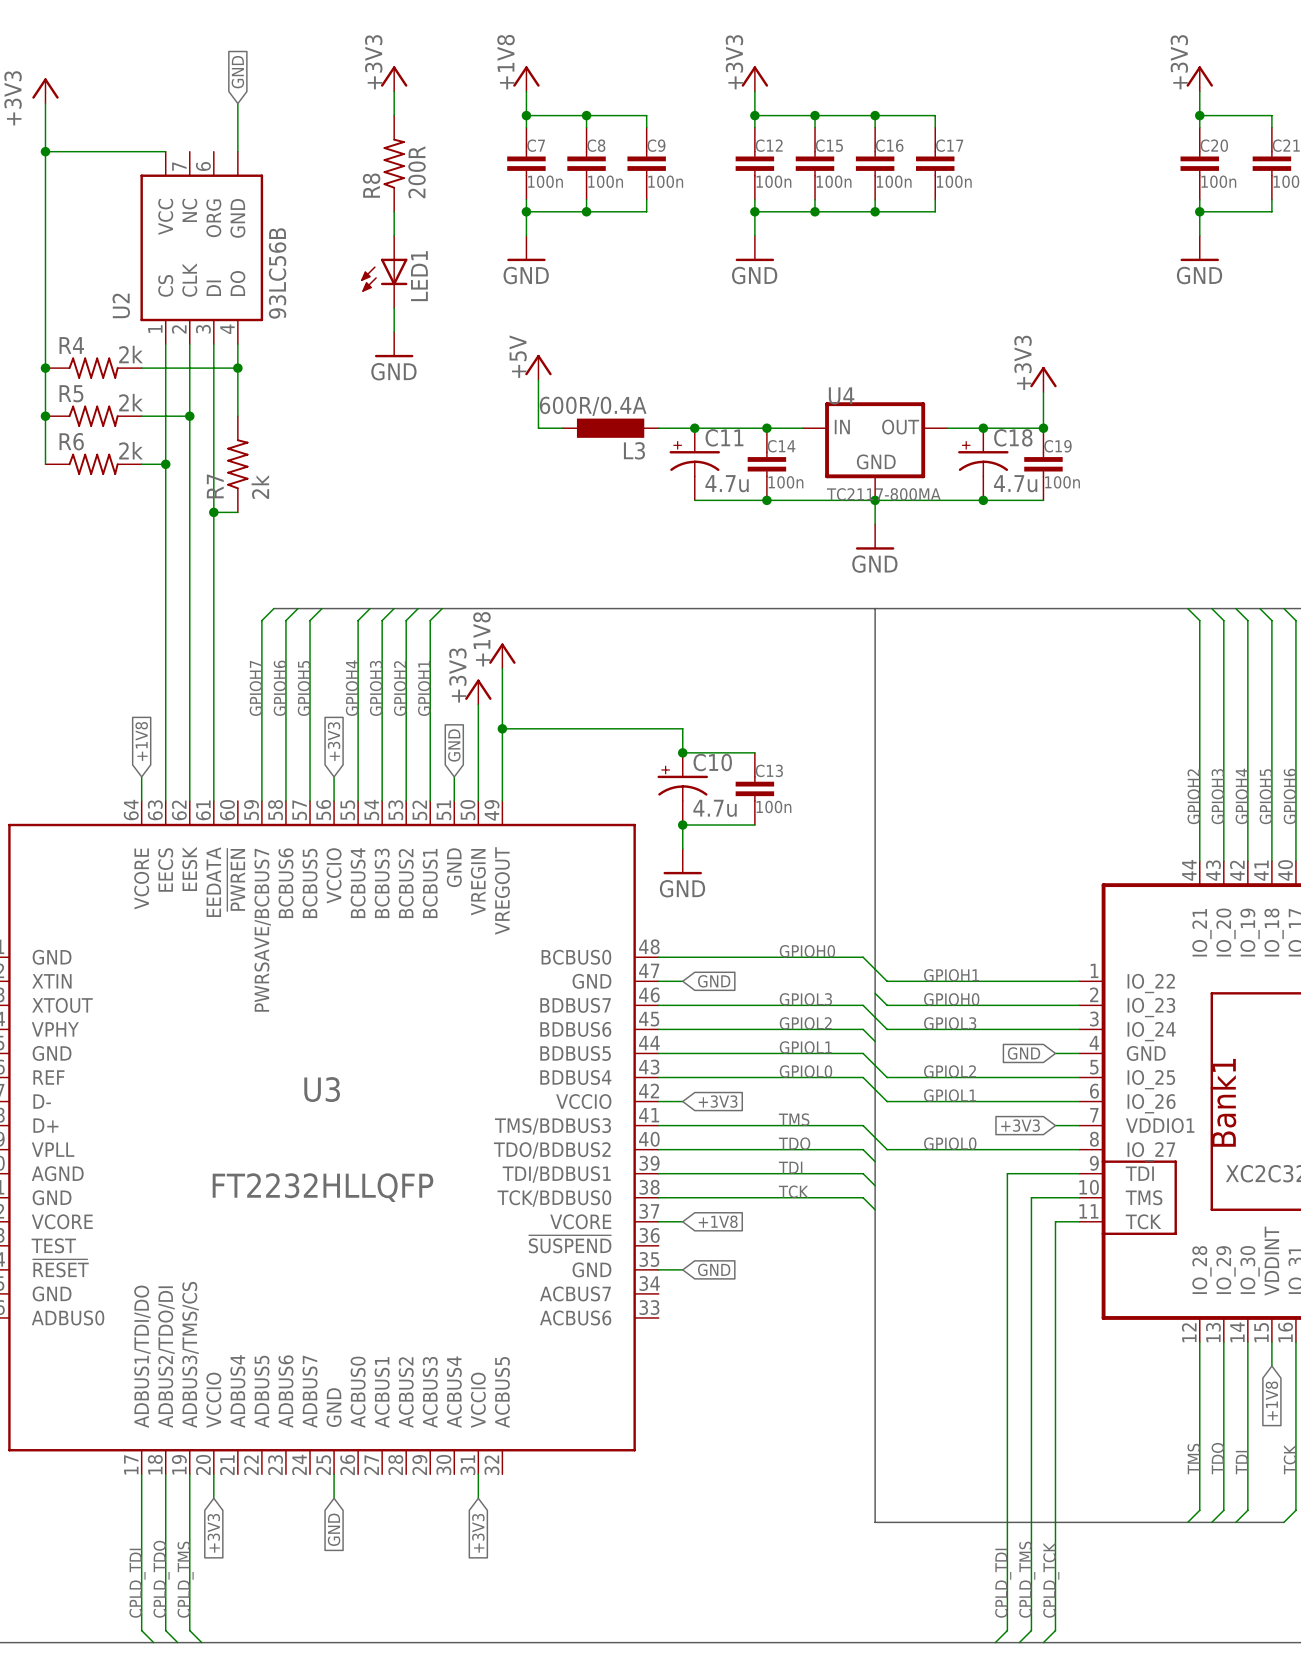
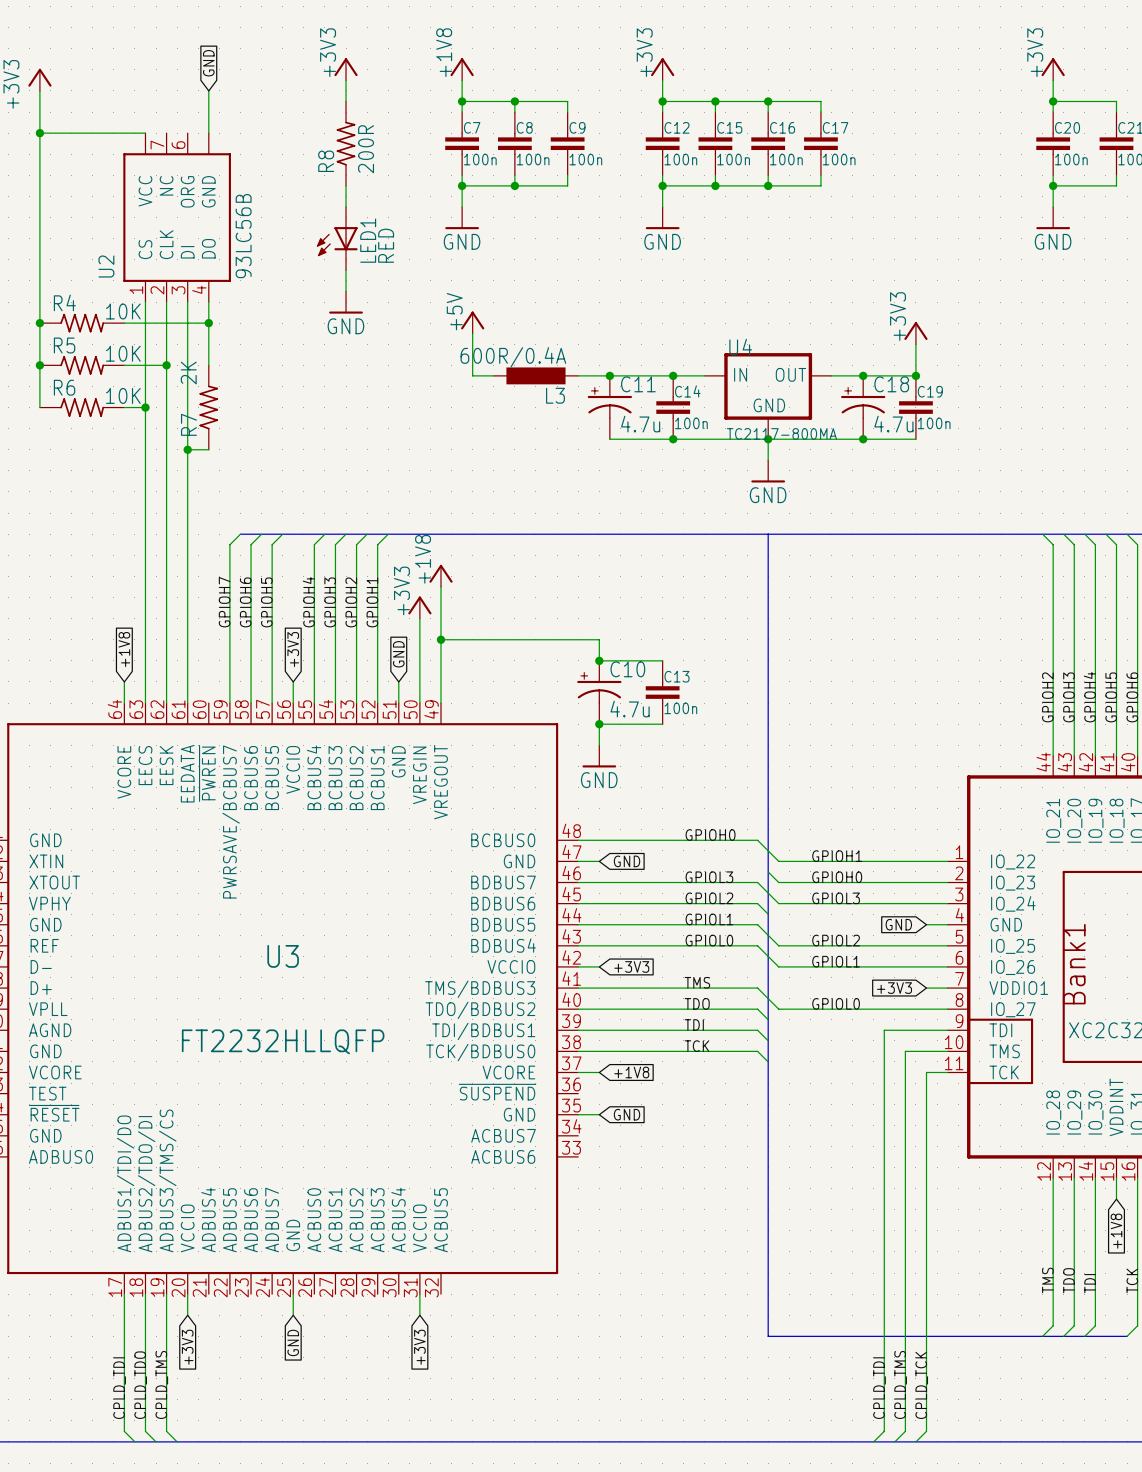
LED1 value: none -> RED (386, 245)
R4 value: 2k (130, 354) -> 10K (123, 311)
R5 value: 2k (130, 402) -> 10K (123, 353)
R6 value: 2k (130, 450) -> 10K (123, 395)
R7 value: 2k (260, 487) -> 2K (188, 373)

